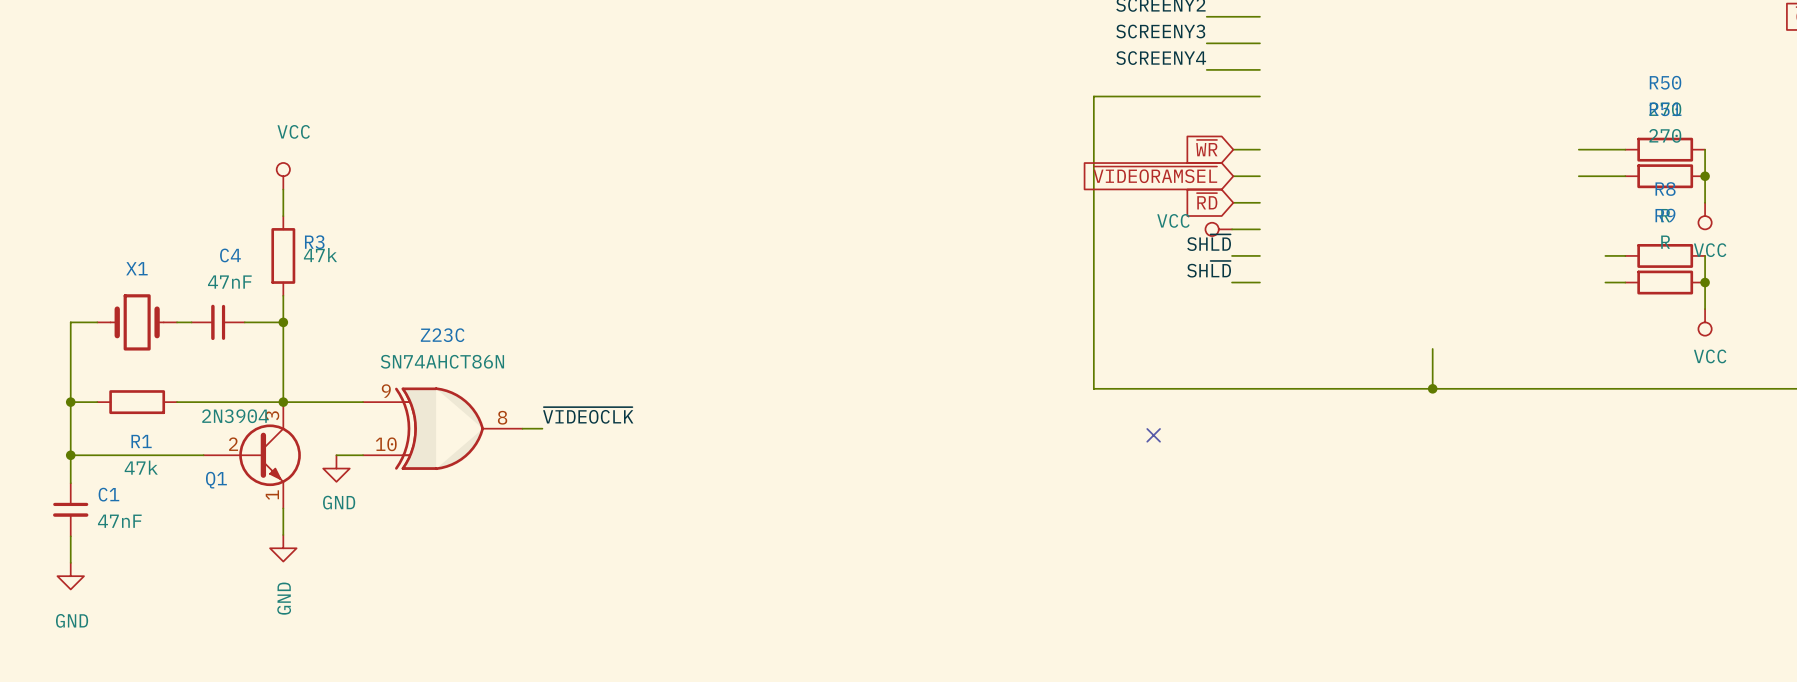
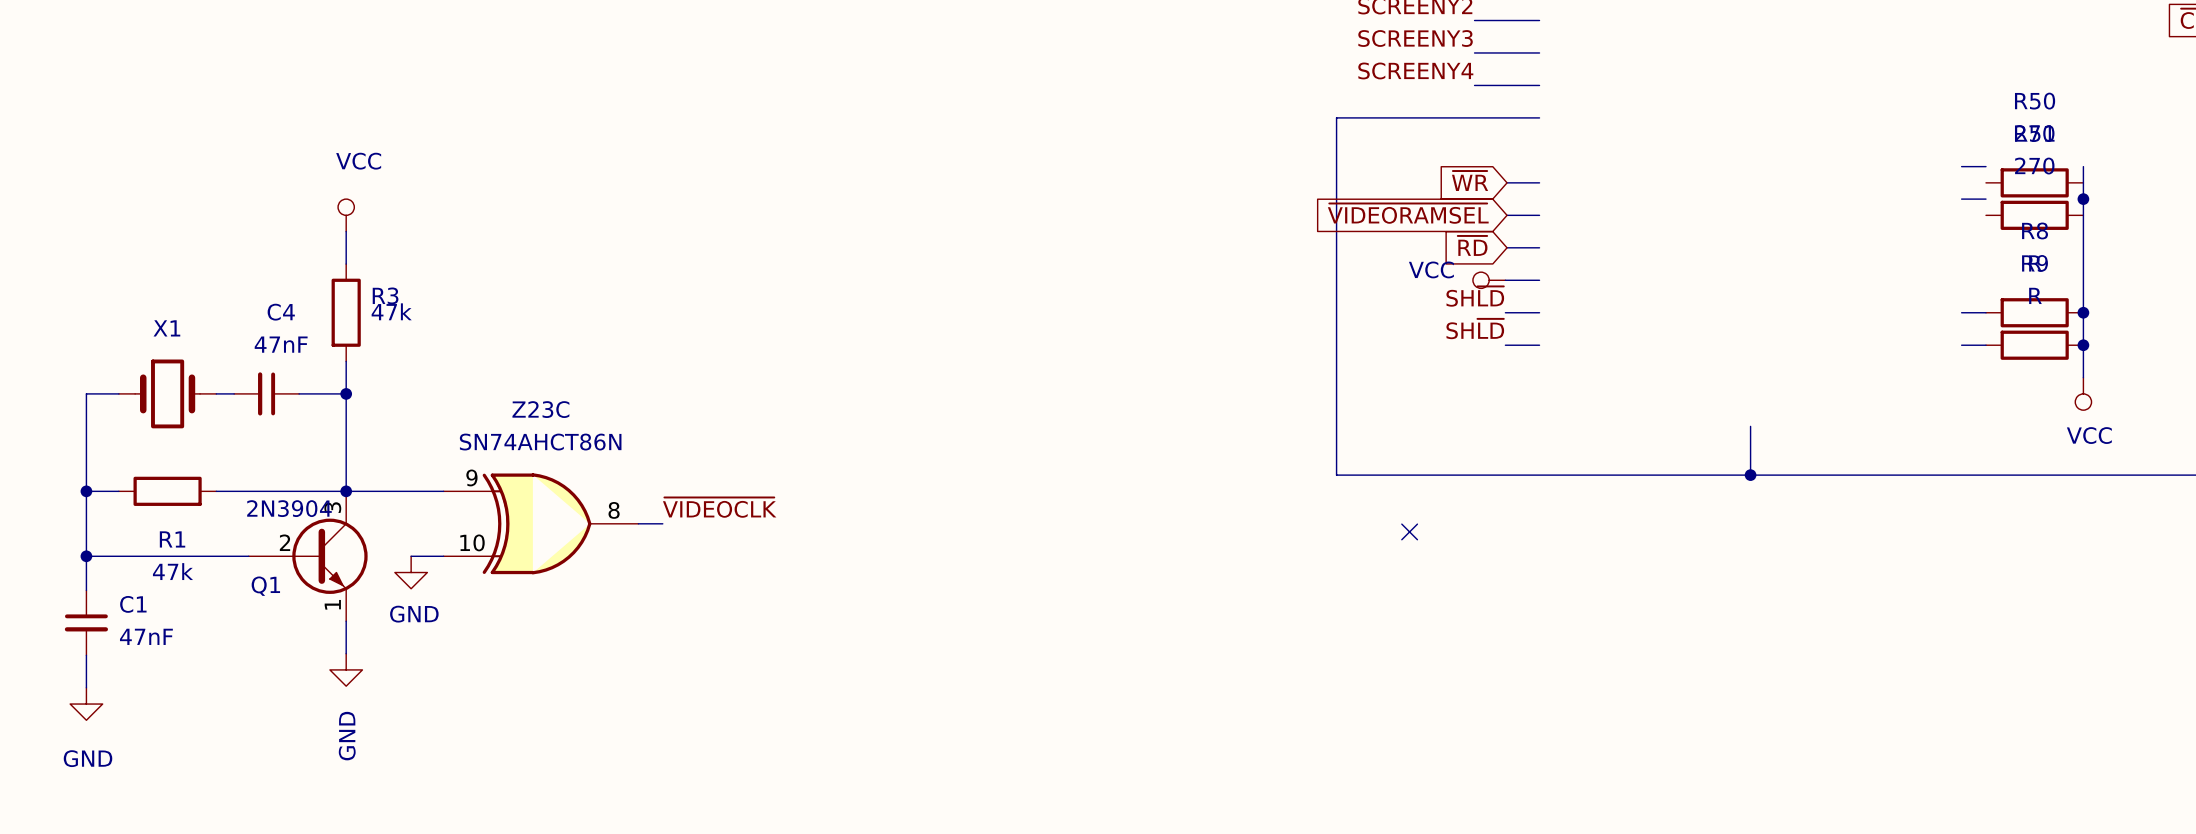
wire: none -> (1961, 166) (1985, 166)
wire: none -> (2083, 166) (2083, 182)
wire: (1578, 149) (1625, 149) -> none
wire: none -> (1961, 199) (1985, 199)
wire: (1578, 176) (1625, 176) -> none
junction position: (1705, 176) -> (2083, 199)
wire: none -> (2083, 247) (2083, 312)
power symbol: VCC (1705, 216) -> none
junction: none -> (2083, 312)

